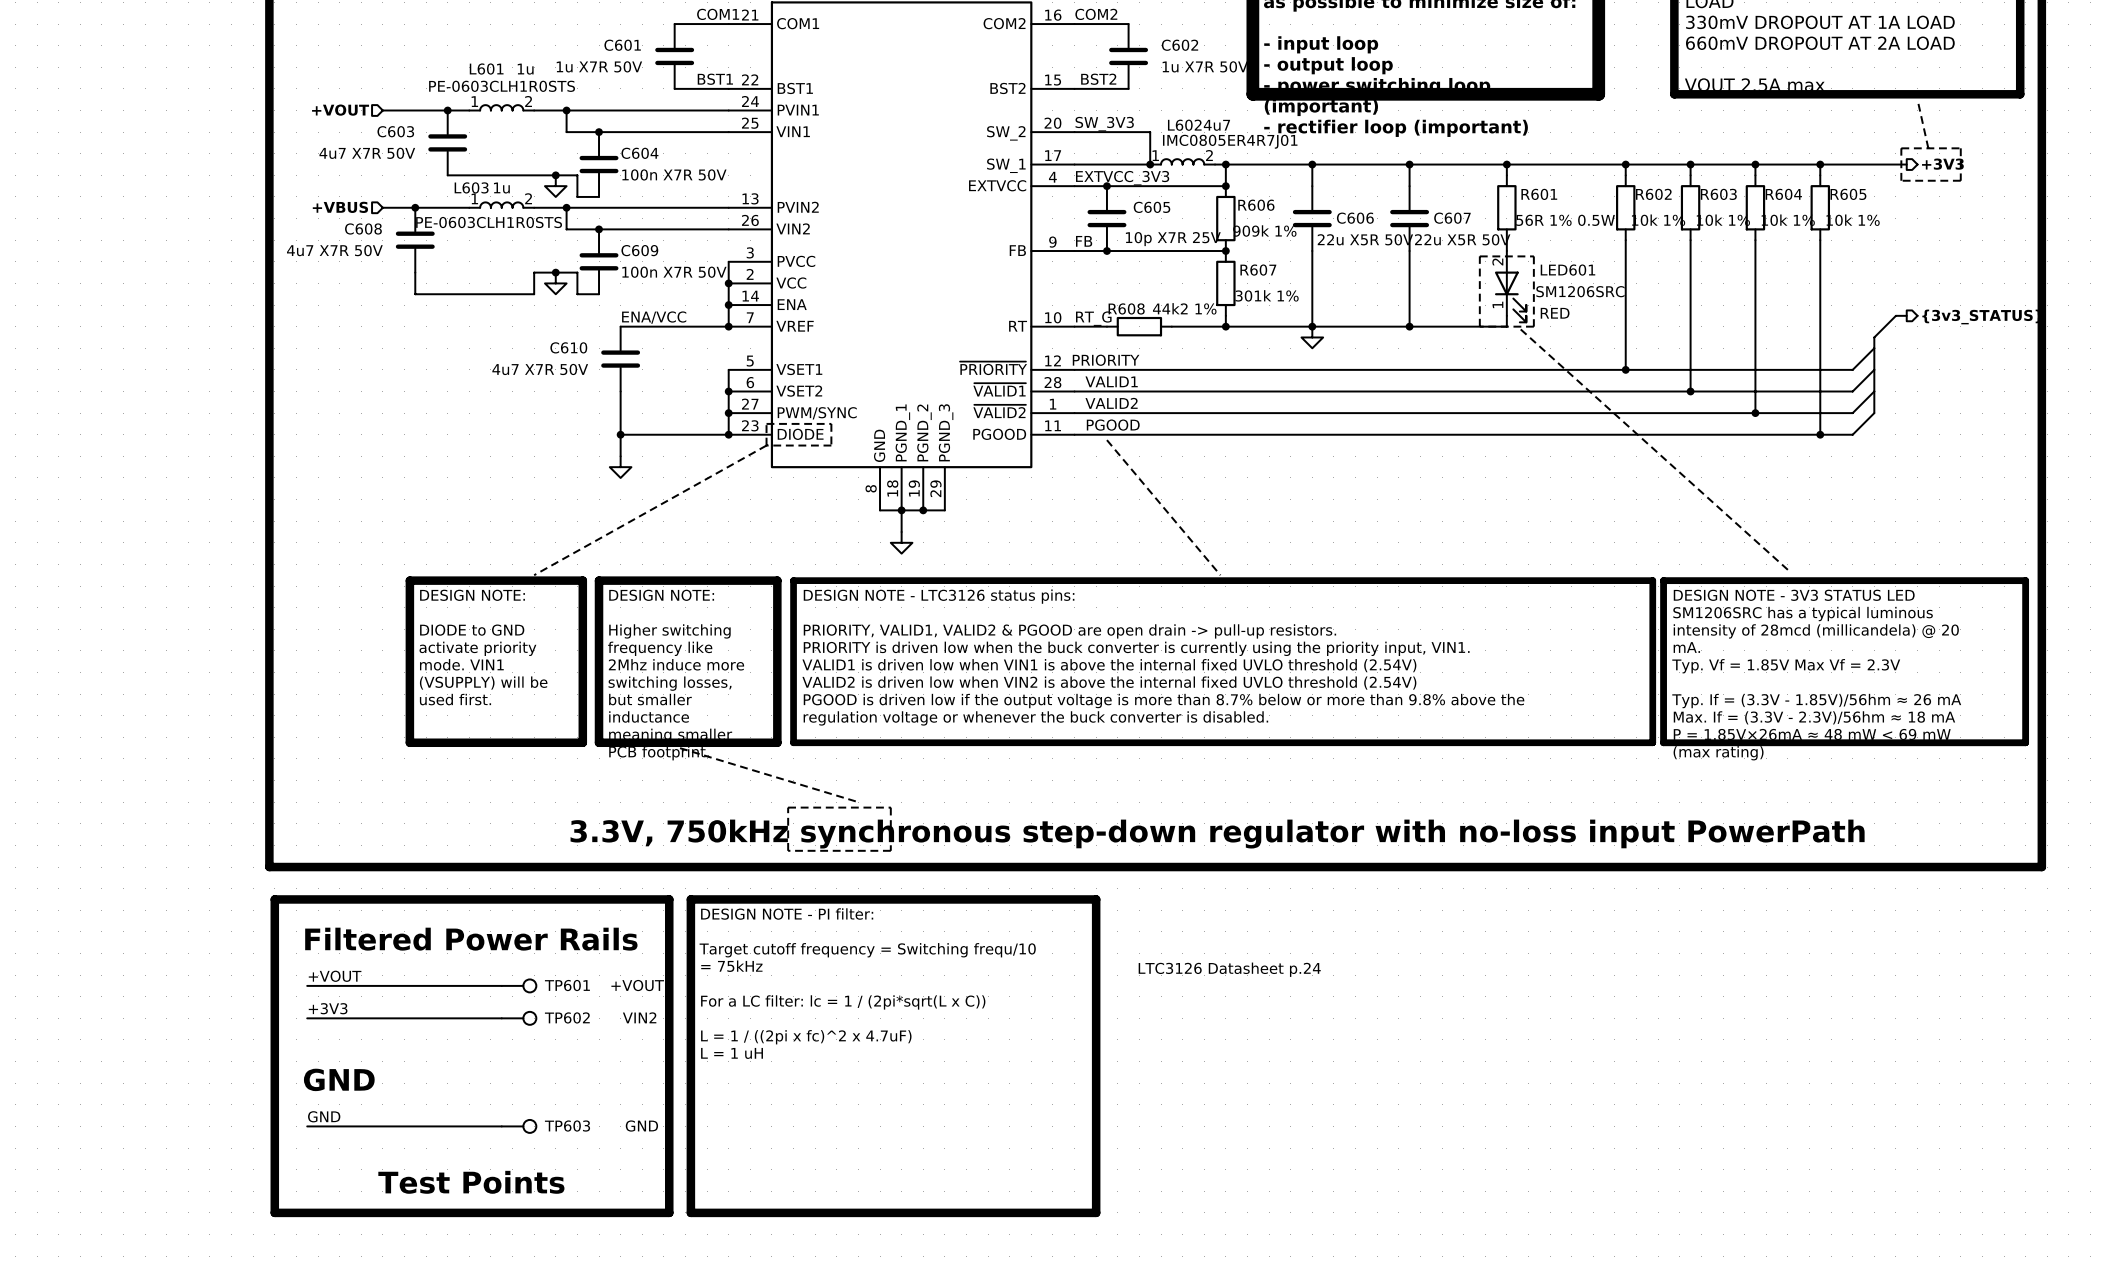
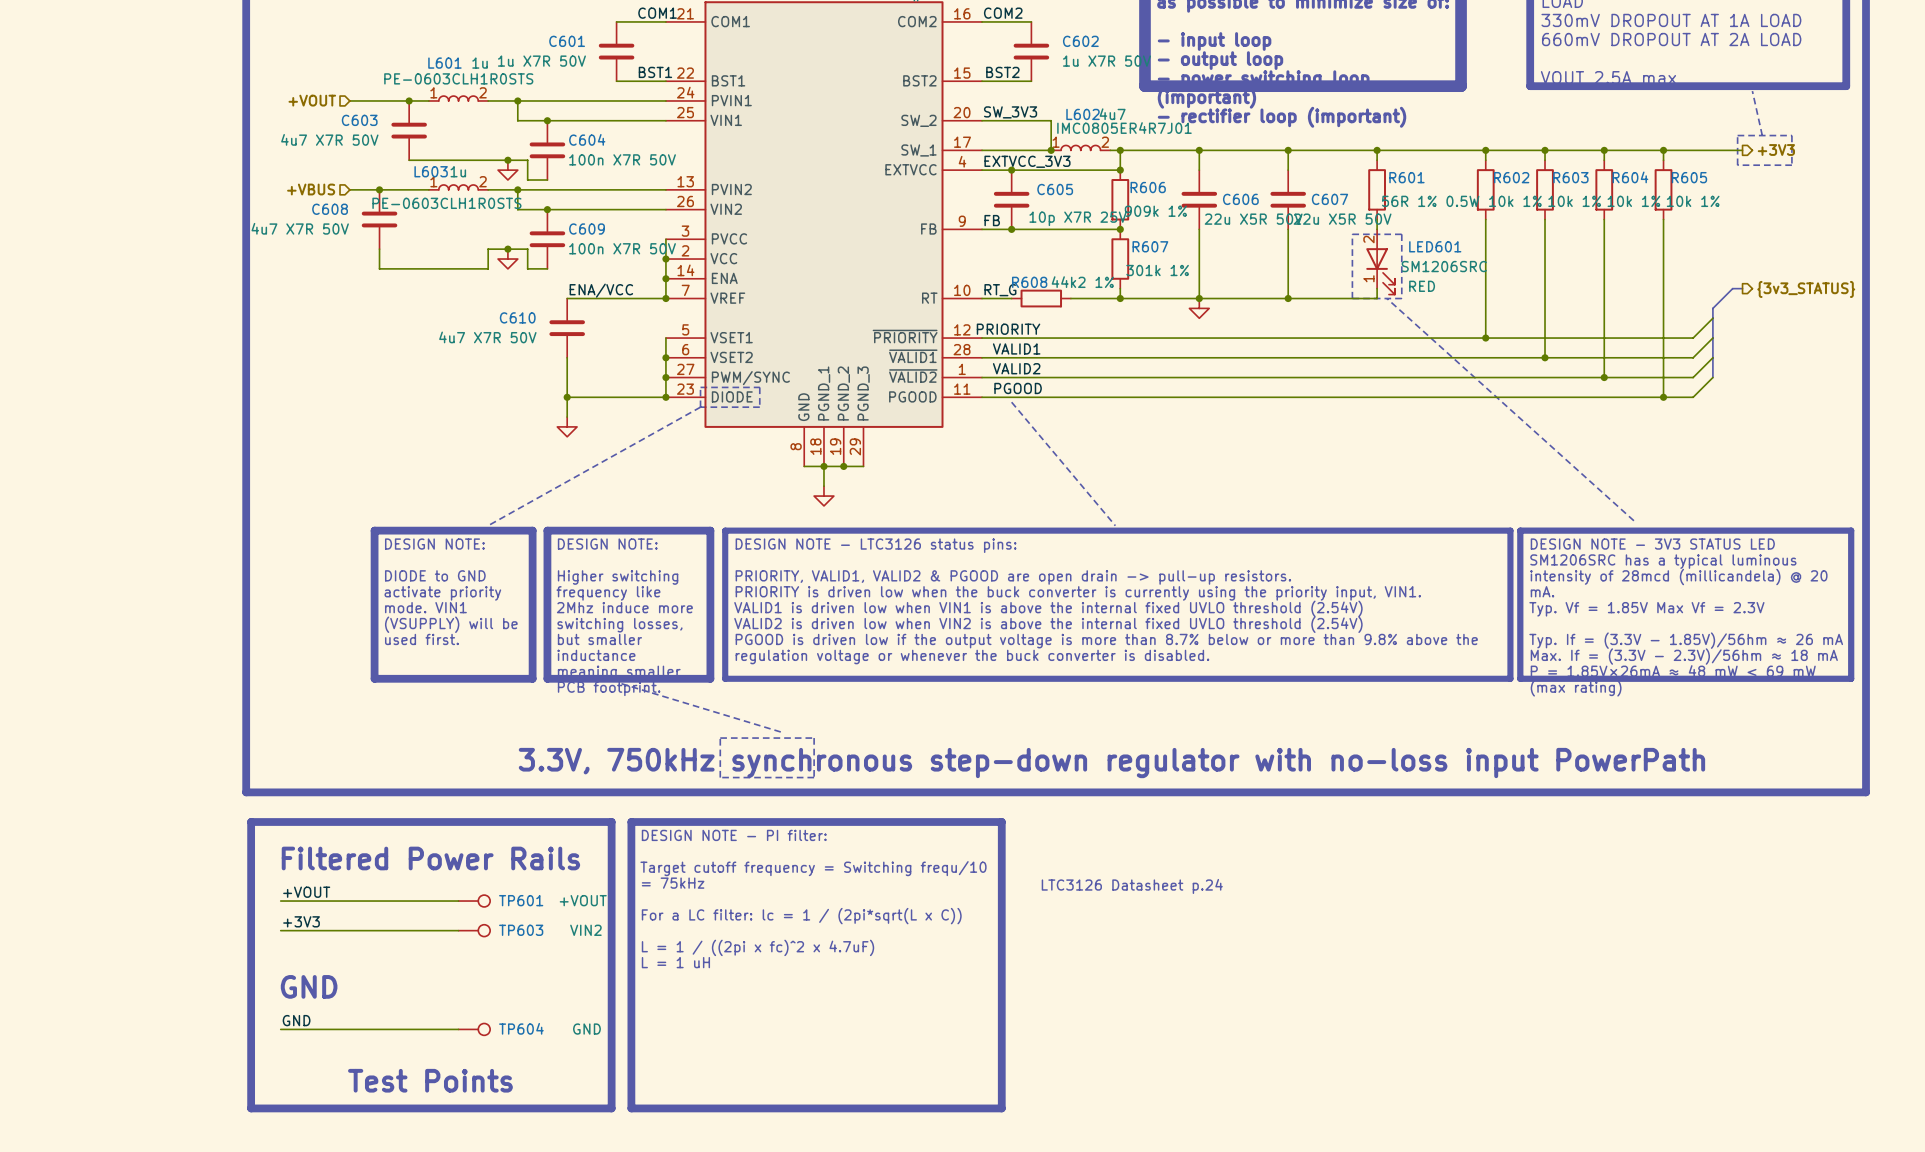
TP602 name: TP602 (567, 1017) -> TP603 (521, 930)
TP603 name: TP603 (567, 1126) -> TP604 (521, 1028)

